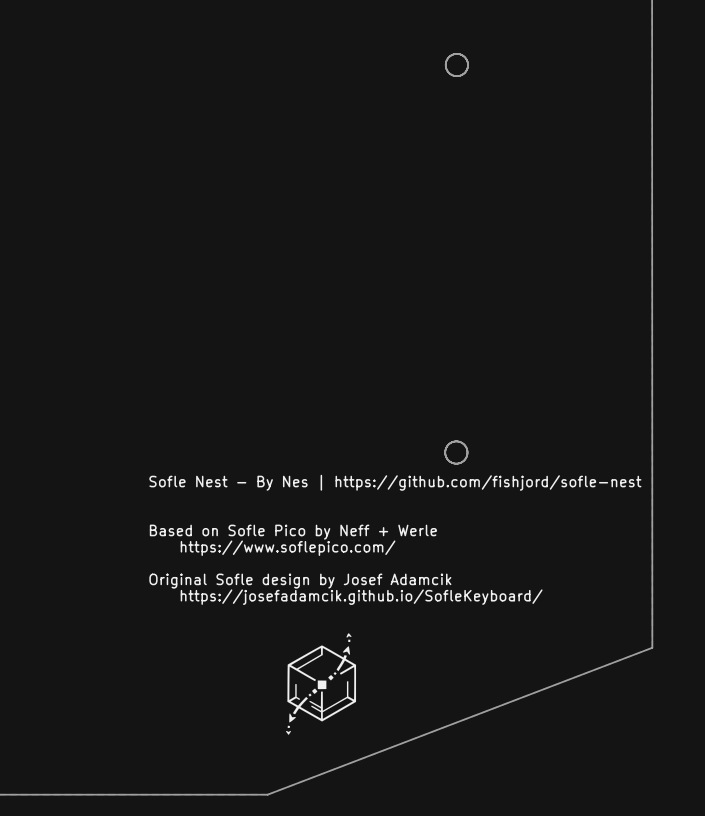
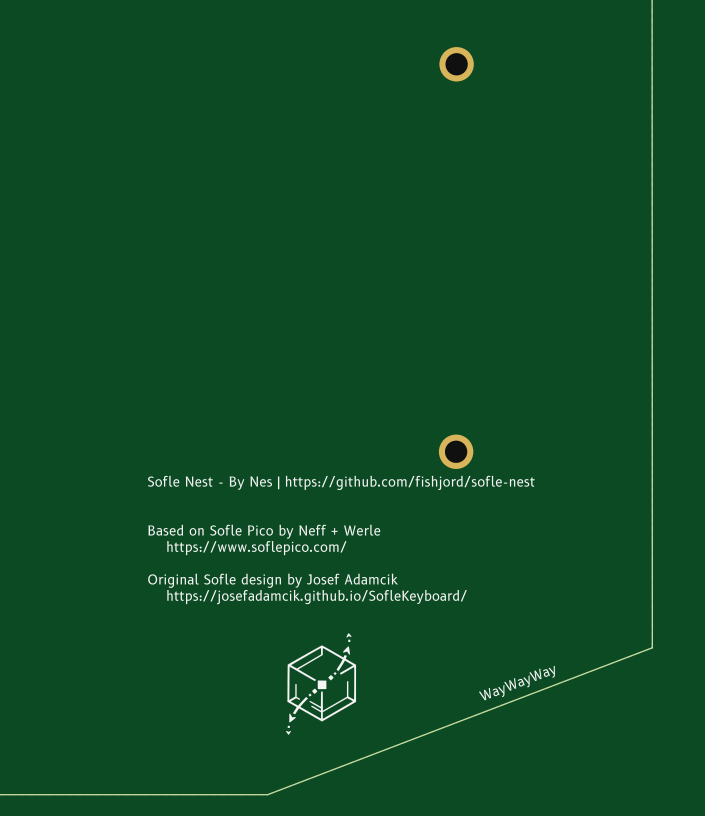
board edge: (455, 53) (448, 57) (445, 66) (449, 73) (458, 76) (465, 72) (467, 63) (463, 56) (455, 53) -> none
part: none -> (456, 64)
board edge: (456, 441) (448, 444) (445, 452) (448, 460) (456, 463) (464, 460) (467, 452) (464, 444) (456, 441) -> none
part: none -> (456, 451)
text: none -> WayWayWay (516, 683)

